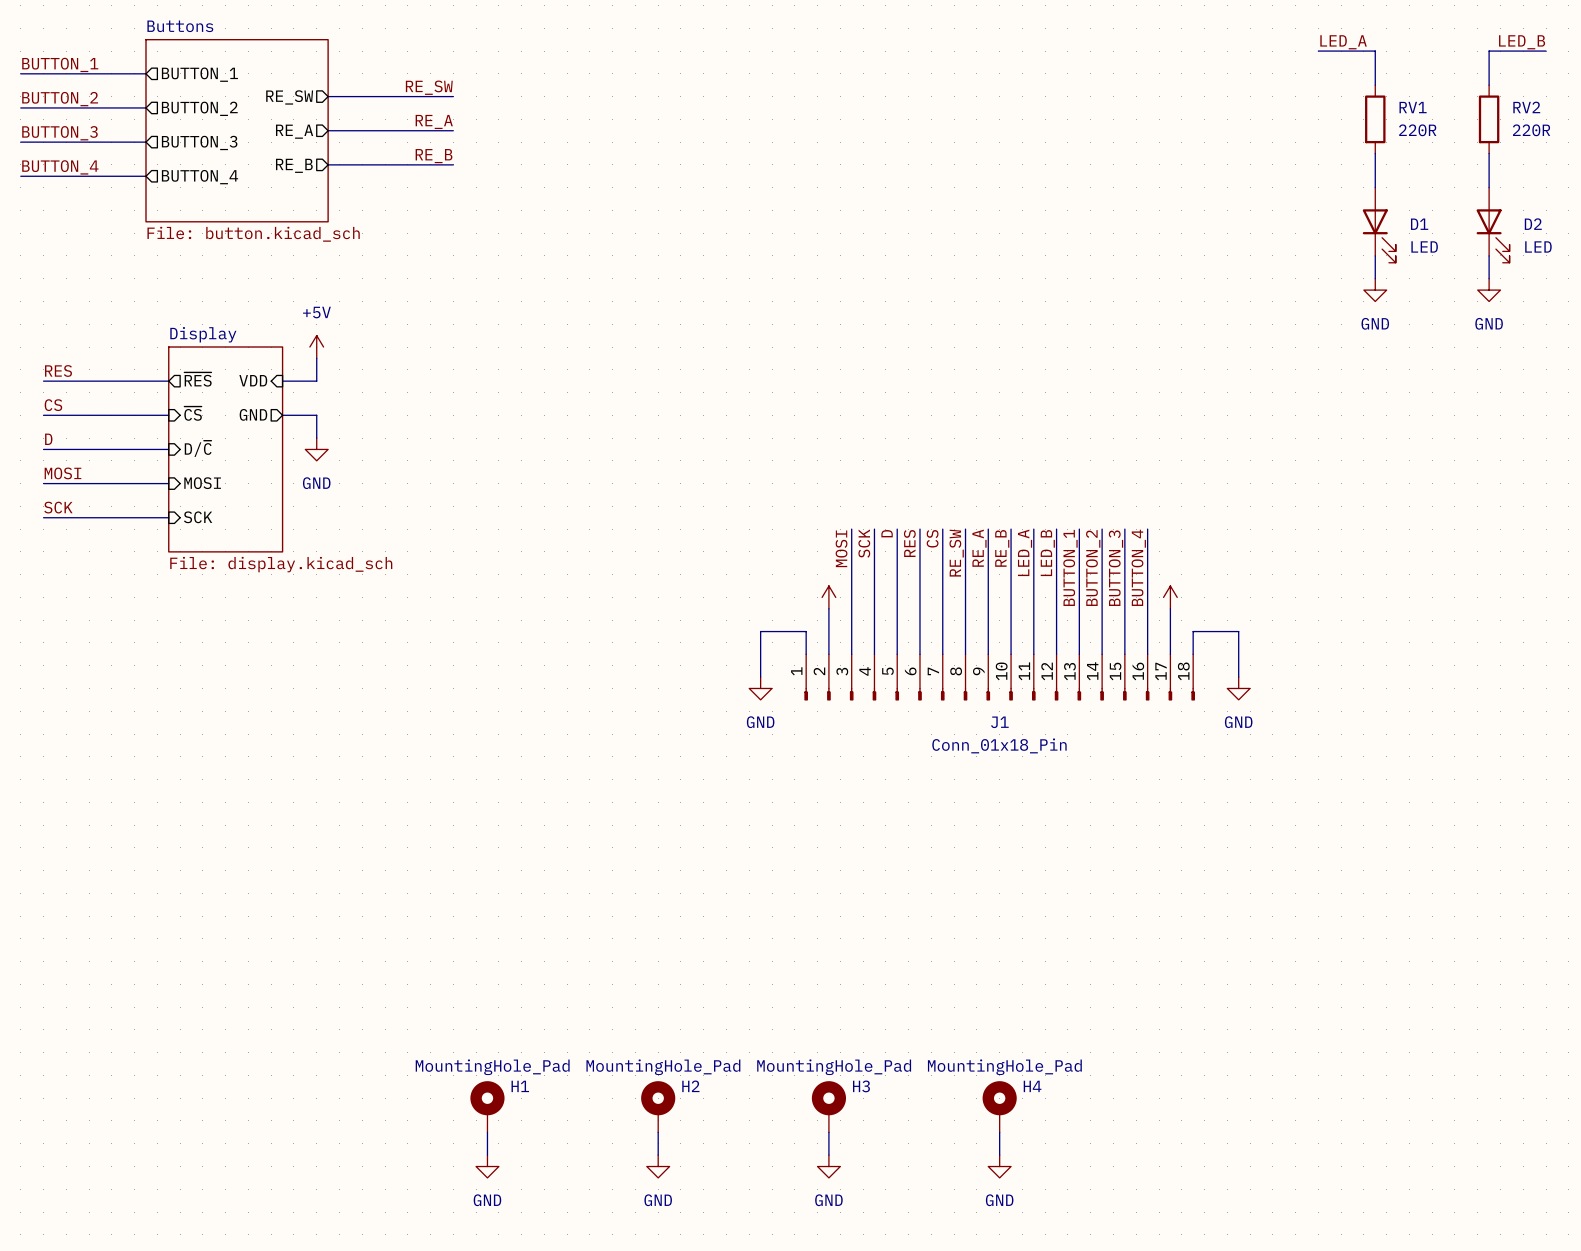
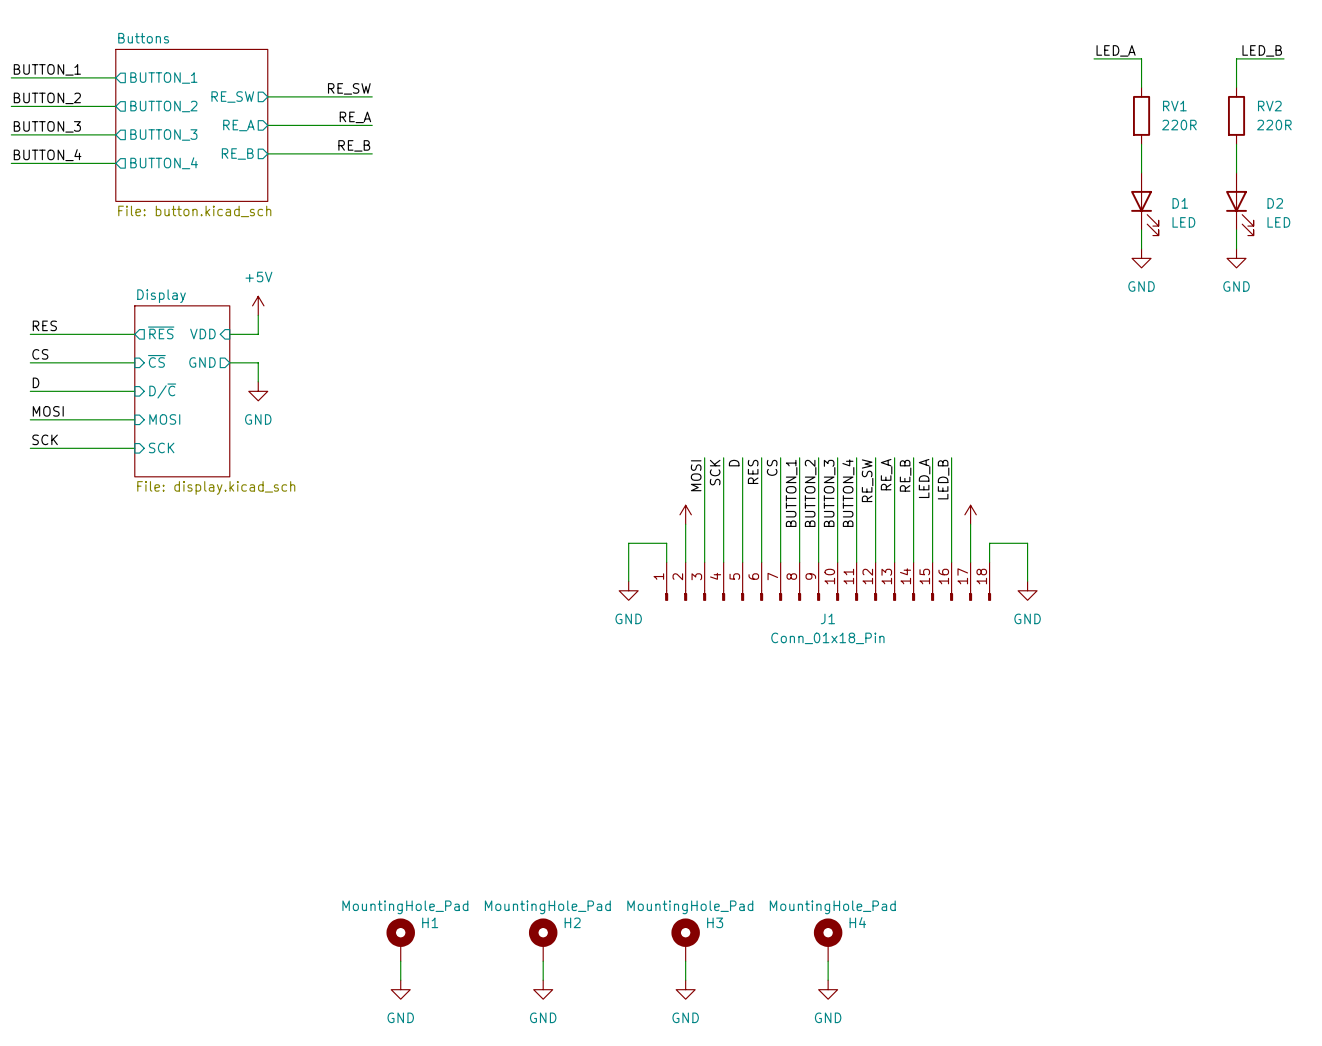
label: RE_A (979, 548) -> BUTTON_2 (810, 493)
label: RE_B (1002, 548) -> BUTTON_3 (829, 493)
label: LED_A (1025, 552) -> BUTTON_4 (848, 493)
label: RE_SW (956, 553) -> BUTTON_1 (791, 493)
label: LED_B (1047, 553) -> RE_SW (867, 480)
label: BUTTON_1 (1070, 567) -> RE_A (886, 474)
label: BUTTON_4 (1138, 567) -> LED_B (943, 479)
label: BUTTON_2 (1093, 568) -> RE_B (905, 475)
label: BUTTON_3 (1115, 568) -> LED_A (924, 478)

